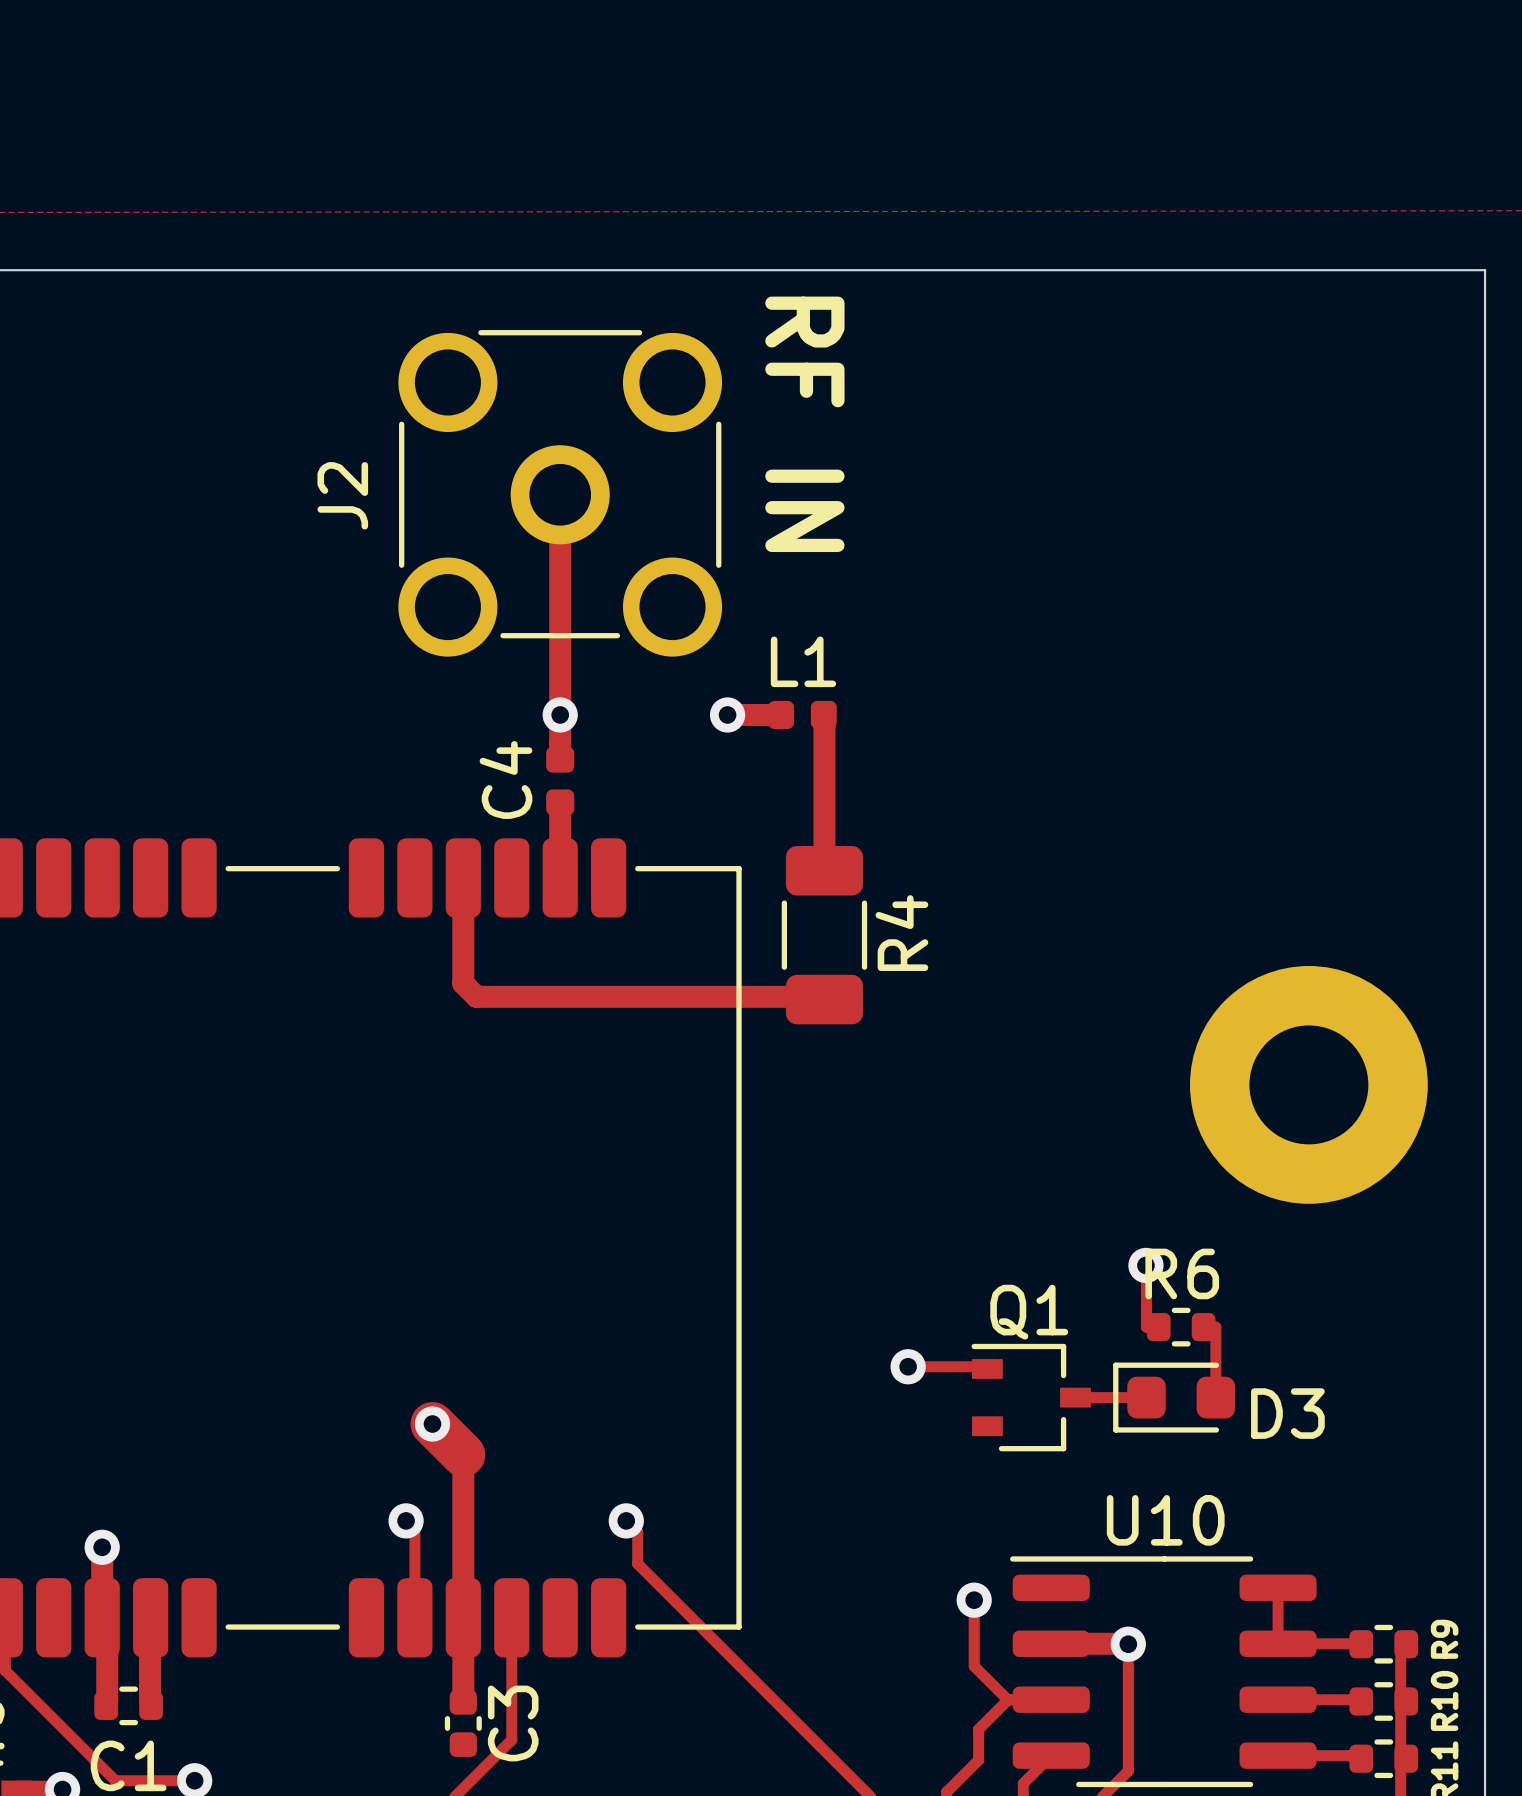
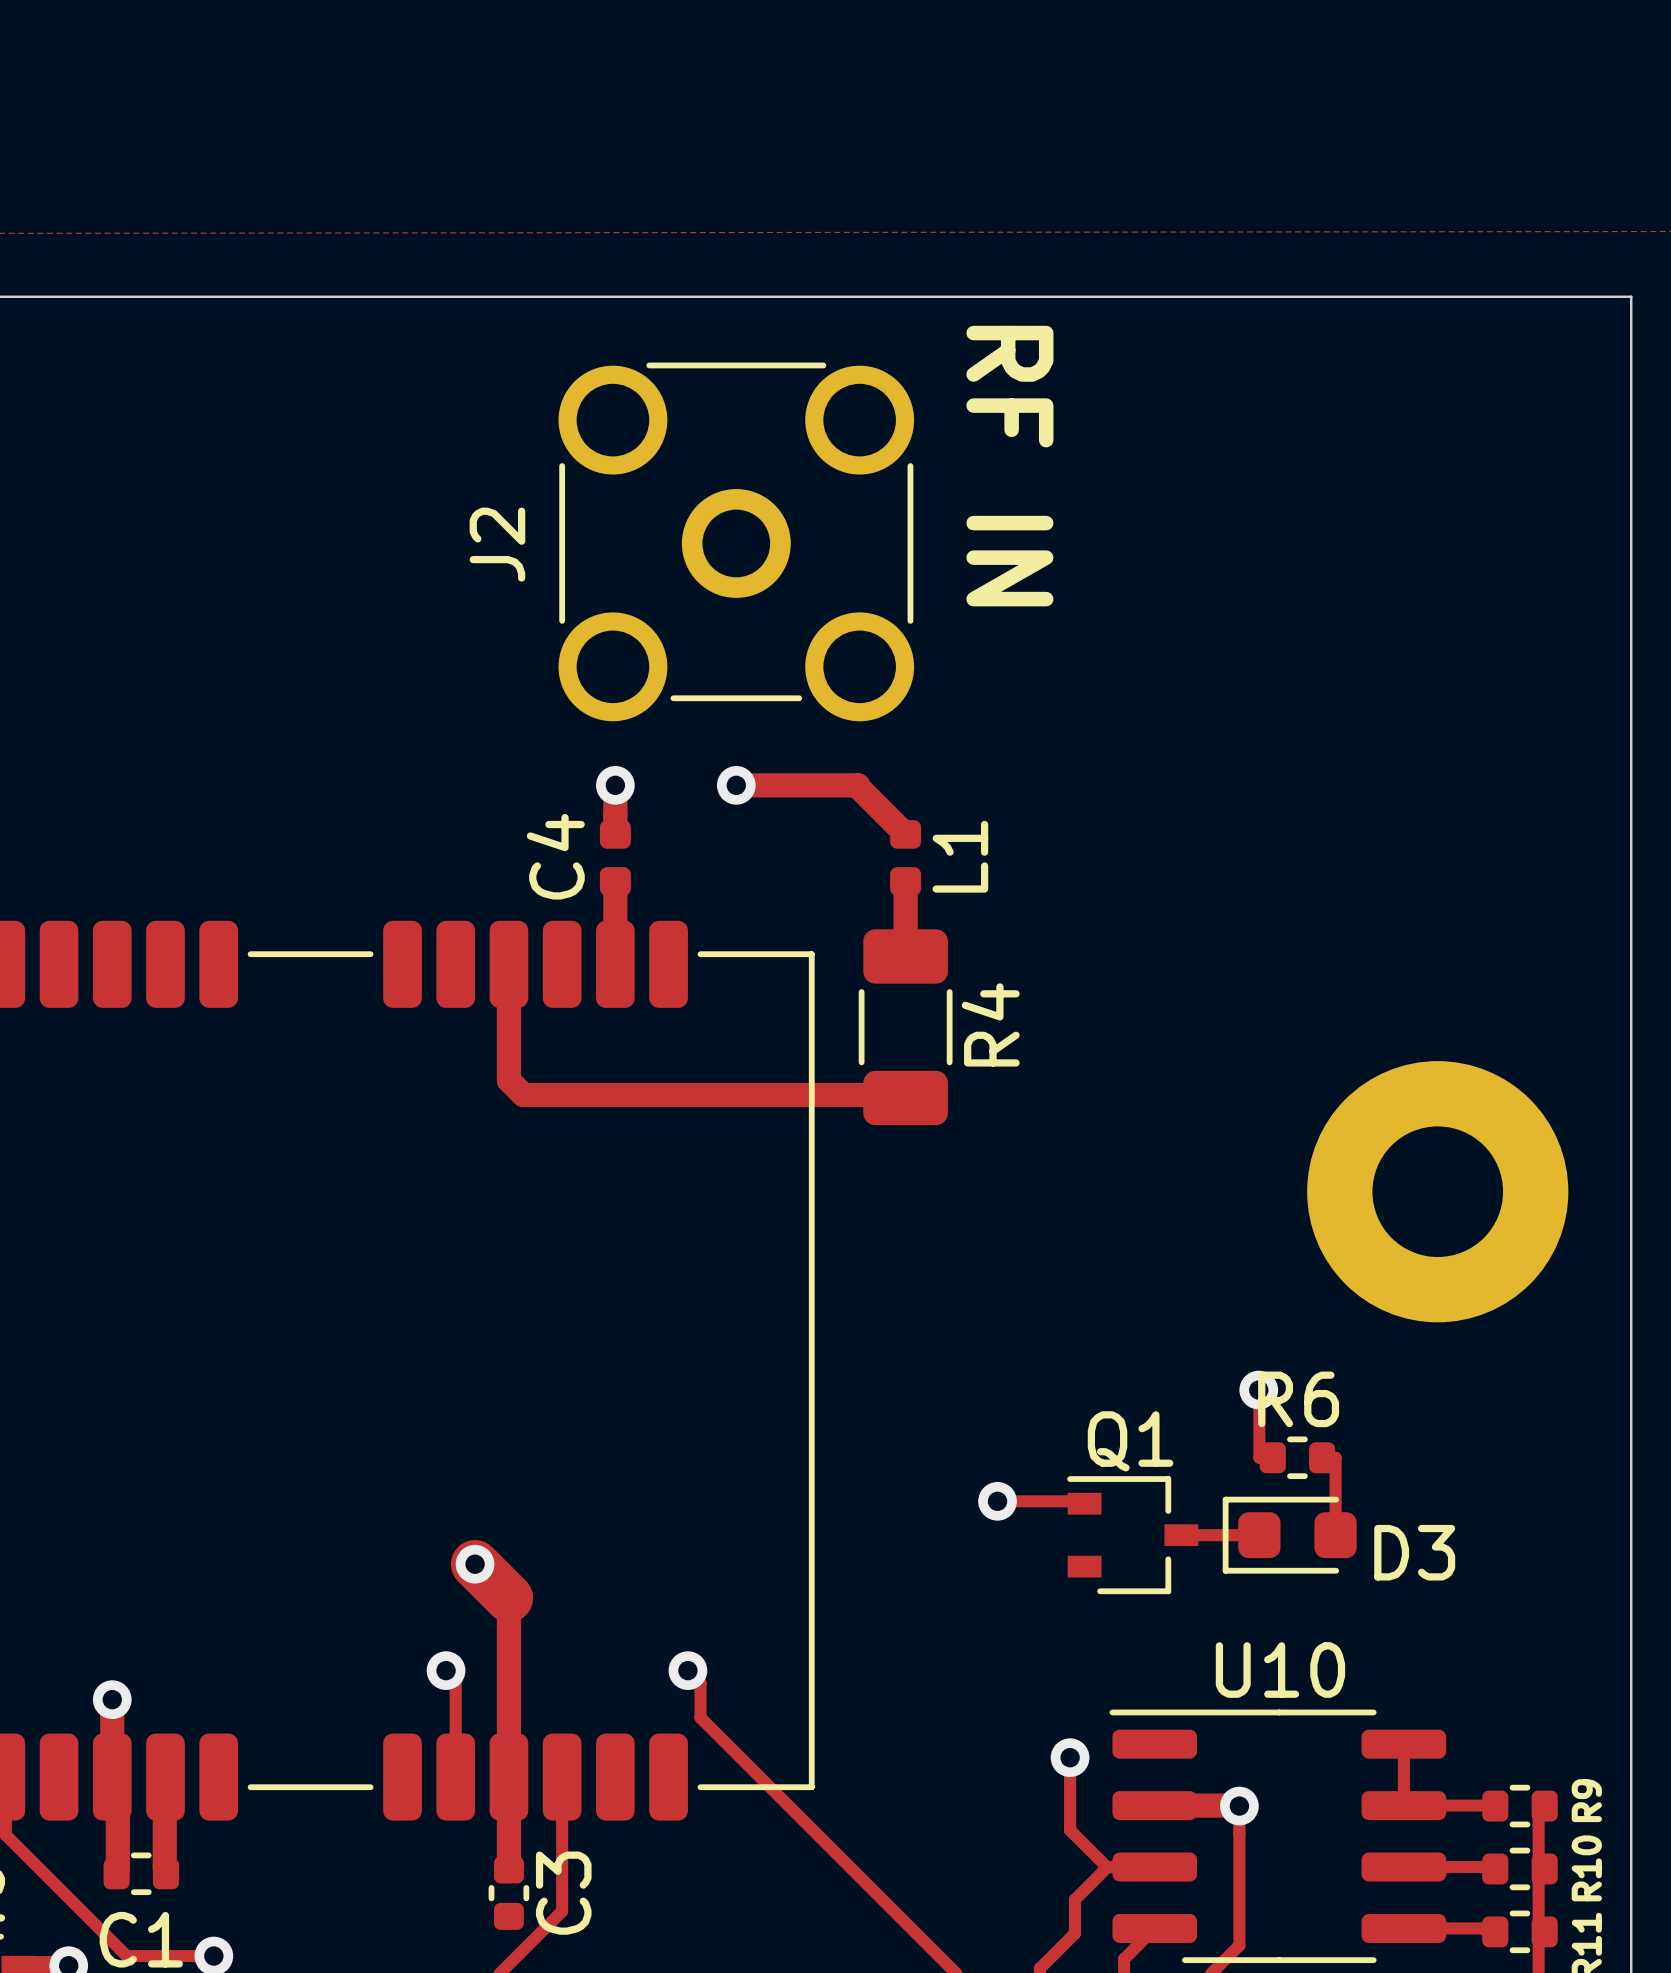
text position: RF IN (804, 424) -> RF IN (1009, 466)
J2 position: (560, 493) -> (736, 541)
track: (560, 494) (560, 714) -> none
track: none -> (736, 785) (799, 785)
via position: (727, 714) -> (736, 785)
track: none -> (857, 785) (905, 834)
L1 rotation: 0° (802, 714) -> 90° clockwise (905, 857)
L1 position: (802, 714) -> (905, 857)
track: (823, 714) (824, 802) -> none

